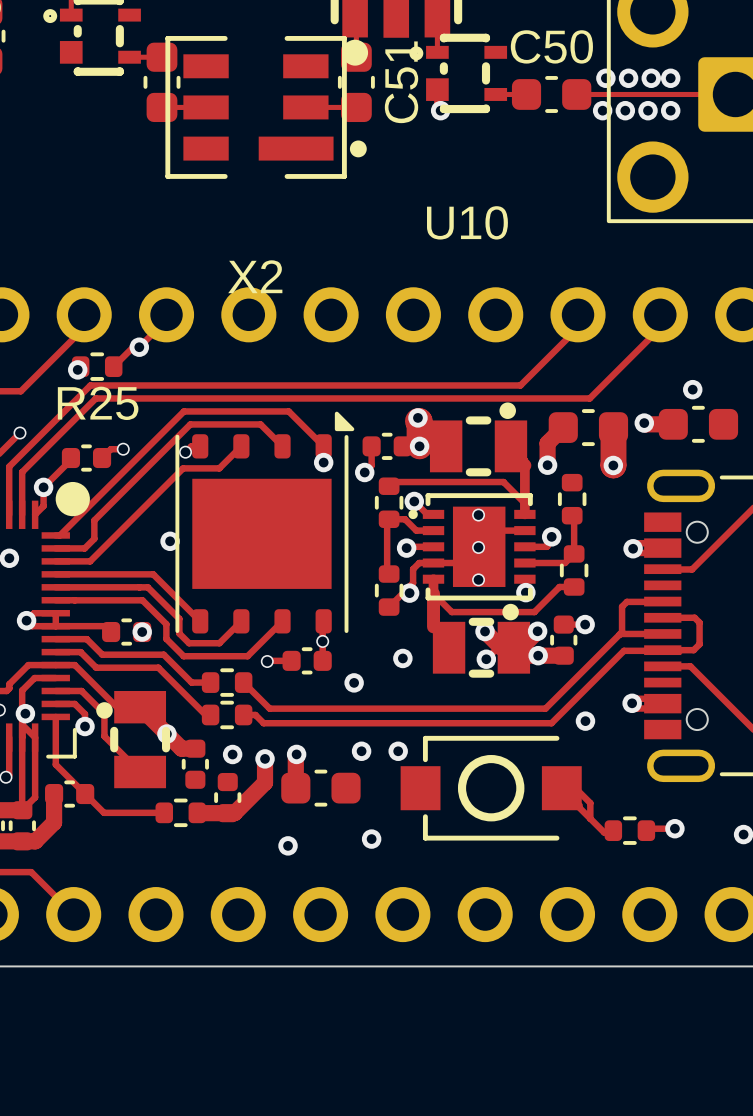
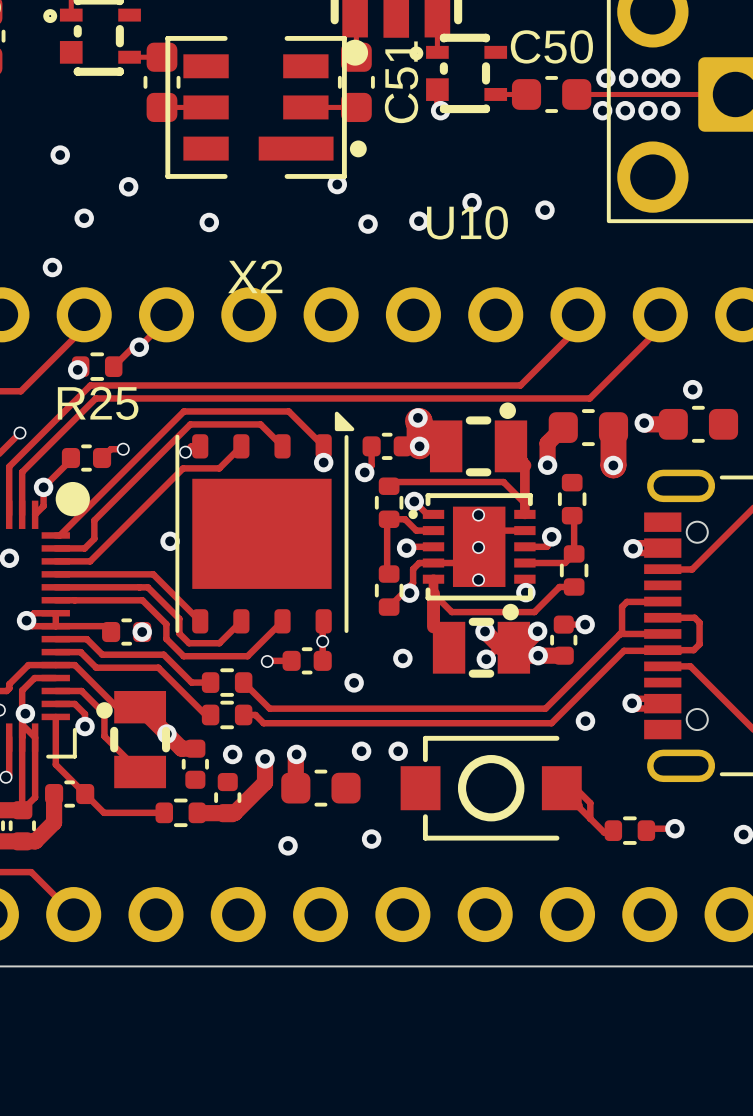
via: none -> (60, 155)
via: none -> (337, 184)
via: none -> (128, 186)
via: none -> (472, 202)
via: none -> (544, 210)
via: none -> (84, 218)
via: none -> (418, 221)
via: none -> (209, 222)
via: none -> (368, 224)
via: none -> (52, 267)

